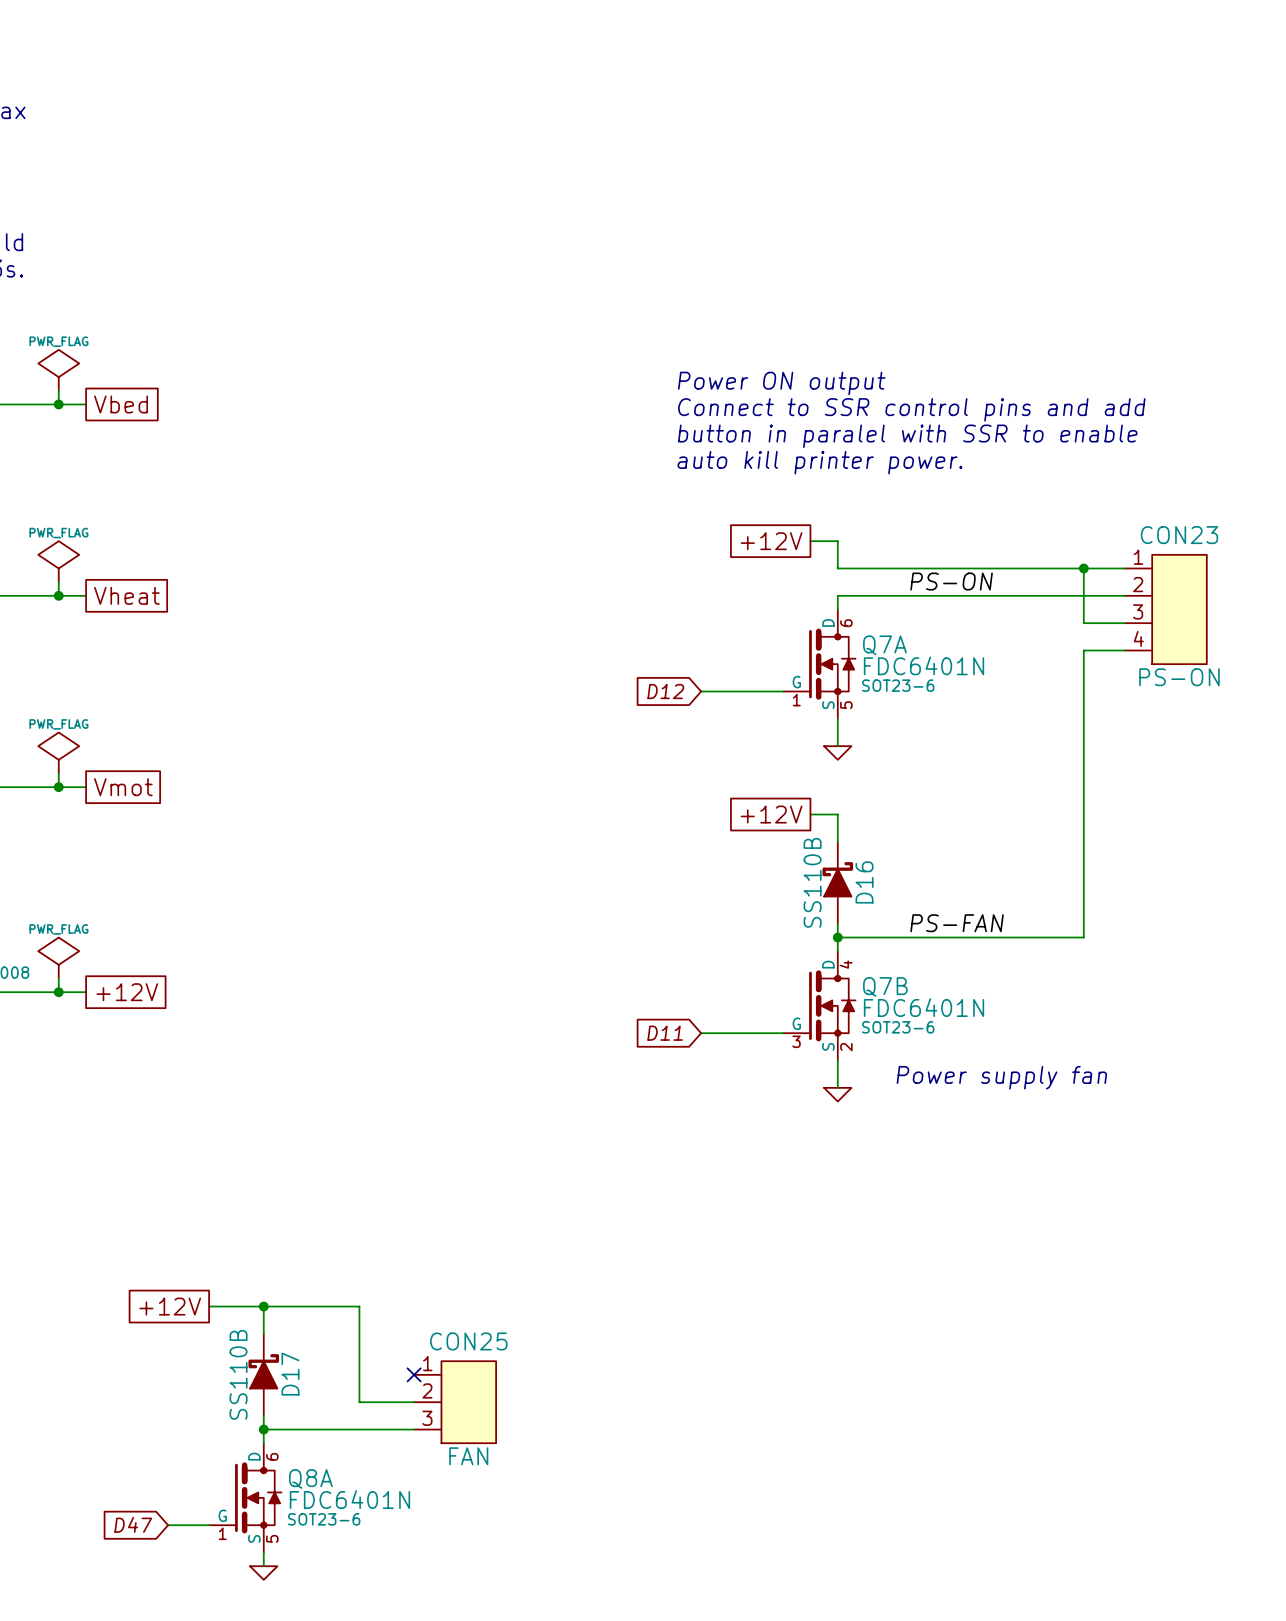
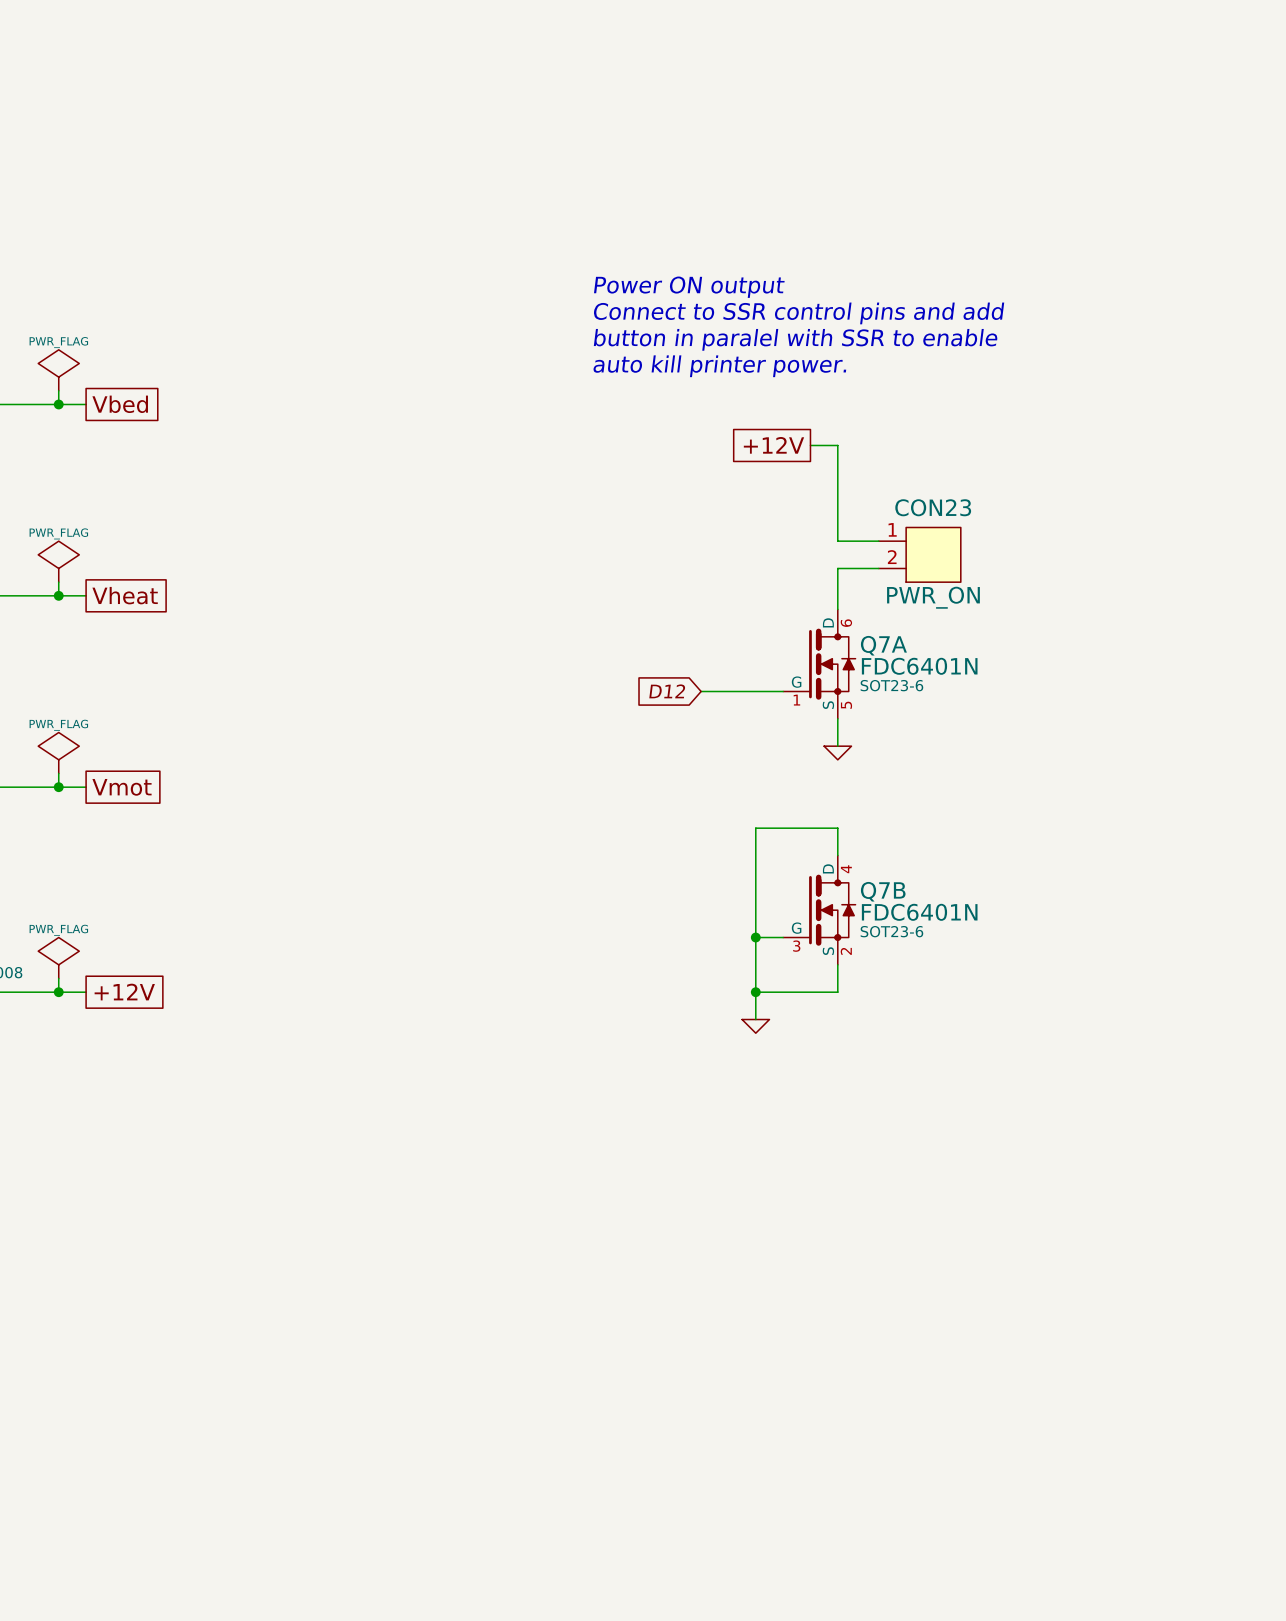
text position: Power ON output (781, 383) -> Power ON output (689, 287)
text position: Connect to SSR control pins and add (911, 409) -> Connect to SSR control pins and add (798, 313)
text position: button in paralel with SSR to enable (907, 436) -> button in paralel with SSR to enable (795, 339)
wire: none -> (810, 445) (837, 445) (837, 541) (878, 541)
text position: auto kill printer power. (819, 462) -> auto kill printer power. (719, 366)
CON23 name position: CON23 (1179, 535) -> CON23 (933, 507)
global label position: +12V (771, 541) -> +12V (773, 445)
wire: (810, 541) (837, 541) (837, 568) -> (837, 595) (837, 568)
CON23 symbol: [1124, 554, 1207, 665] -> [878, 527, 961, 583]
wire: (878, 568) (1124, 568) -> none
wire: (1083, 568) (1083, 623) (1124, 623) -> none
junction: (1083, 568) -> none
label: PS-ON (951, 581) -> none
wire: (837, 595) (1124, 595) -> none
wire: (1124, 650) (1083, 650) (1083, 937) (837, 937) -> none
CON23 value: PS-ON (1179, 677) -> PWR_ON (933, 597)
global label: +12V (771, 814) -> none
wire: (810, 814) (837, 814) (837, 828) -> (755, 1019) (755, 828) (837, 828)
D16: SS110B (837, 882) -> none
label: PS-FAN (957, 923) -> none
wire: none -> (755, 937) (783, 937)
junction: none -> (755, 937)
junction: (837, 937) -> none
wire: none -> (837, 964) (837, 992) (755, 992)
junction: none -> (755, 992)
Q7B position: (819, 1005) -> (819, 910)
global label: D11 (665, 1033) -> none
wire: (701, 1033) (783, 1033) -> none
wire: (837, 1060) (837, 1087) -> none
text: Power supply fan (1001, 1077) -> none
power symbol position: (837, 1094) -> (755, 1026)
global label: +12V (170, 1306) -> none
wire: (209, 1306) (359, 1306) (359, 1402) (414, 1402) -> none
wire: (263, 1306) (263, 1333) -> none
junction: (263, 1306) -> none
D17: SS110B (263, 1374) -> none
no-connect mark: (414, 1374) -> none
CON25: FAN (455, 1402) -> none
wire: (263, 1415) (263, 1443) -> none
wire: (263, 1429) (414, 1429) -> none
junction: (263, 1429) -> none
Q8A: FDC6401N (245, 1497) -> none
global label: D47 (133, 1524) -> none
wire: (168, 1525) (209, 1525) -> none
wire: (263, 1552) (263, 1566) -> none
power symbol: (263, 1573) -> none

